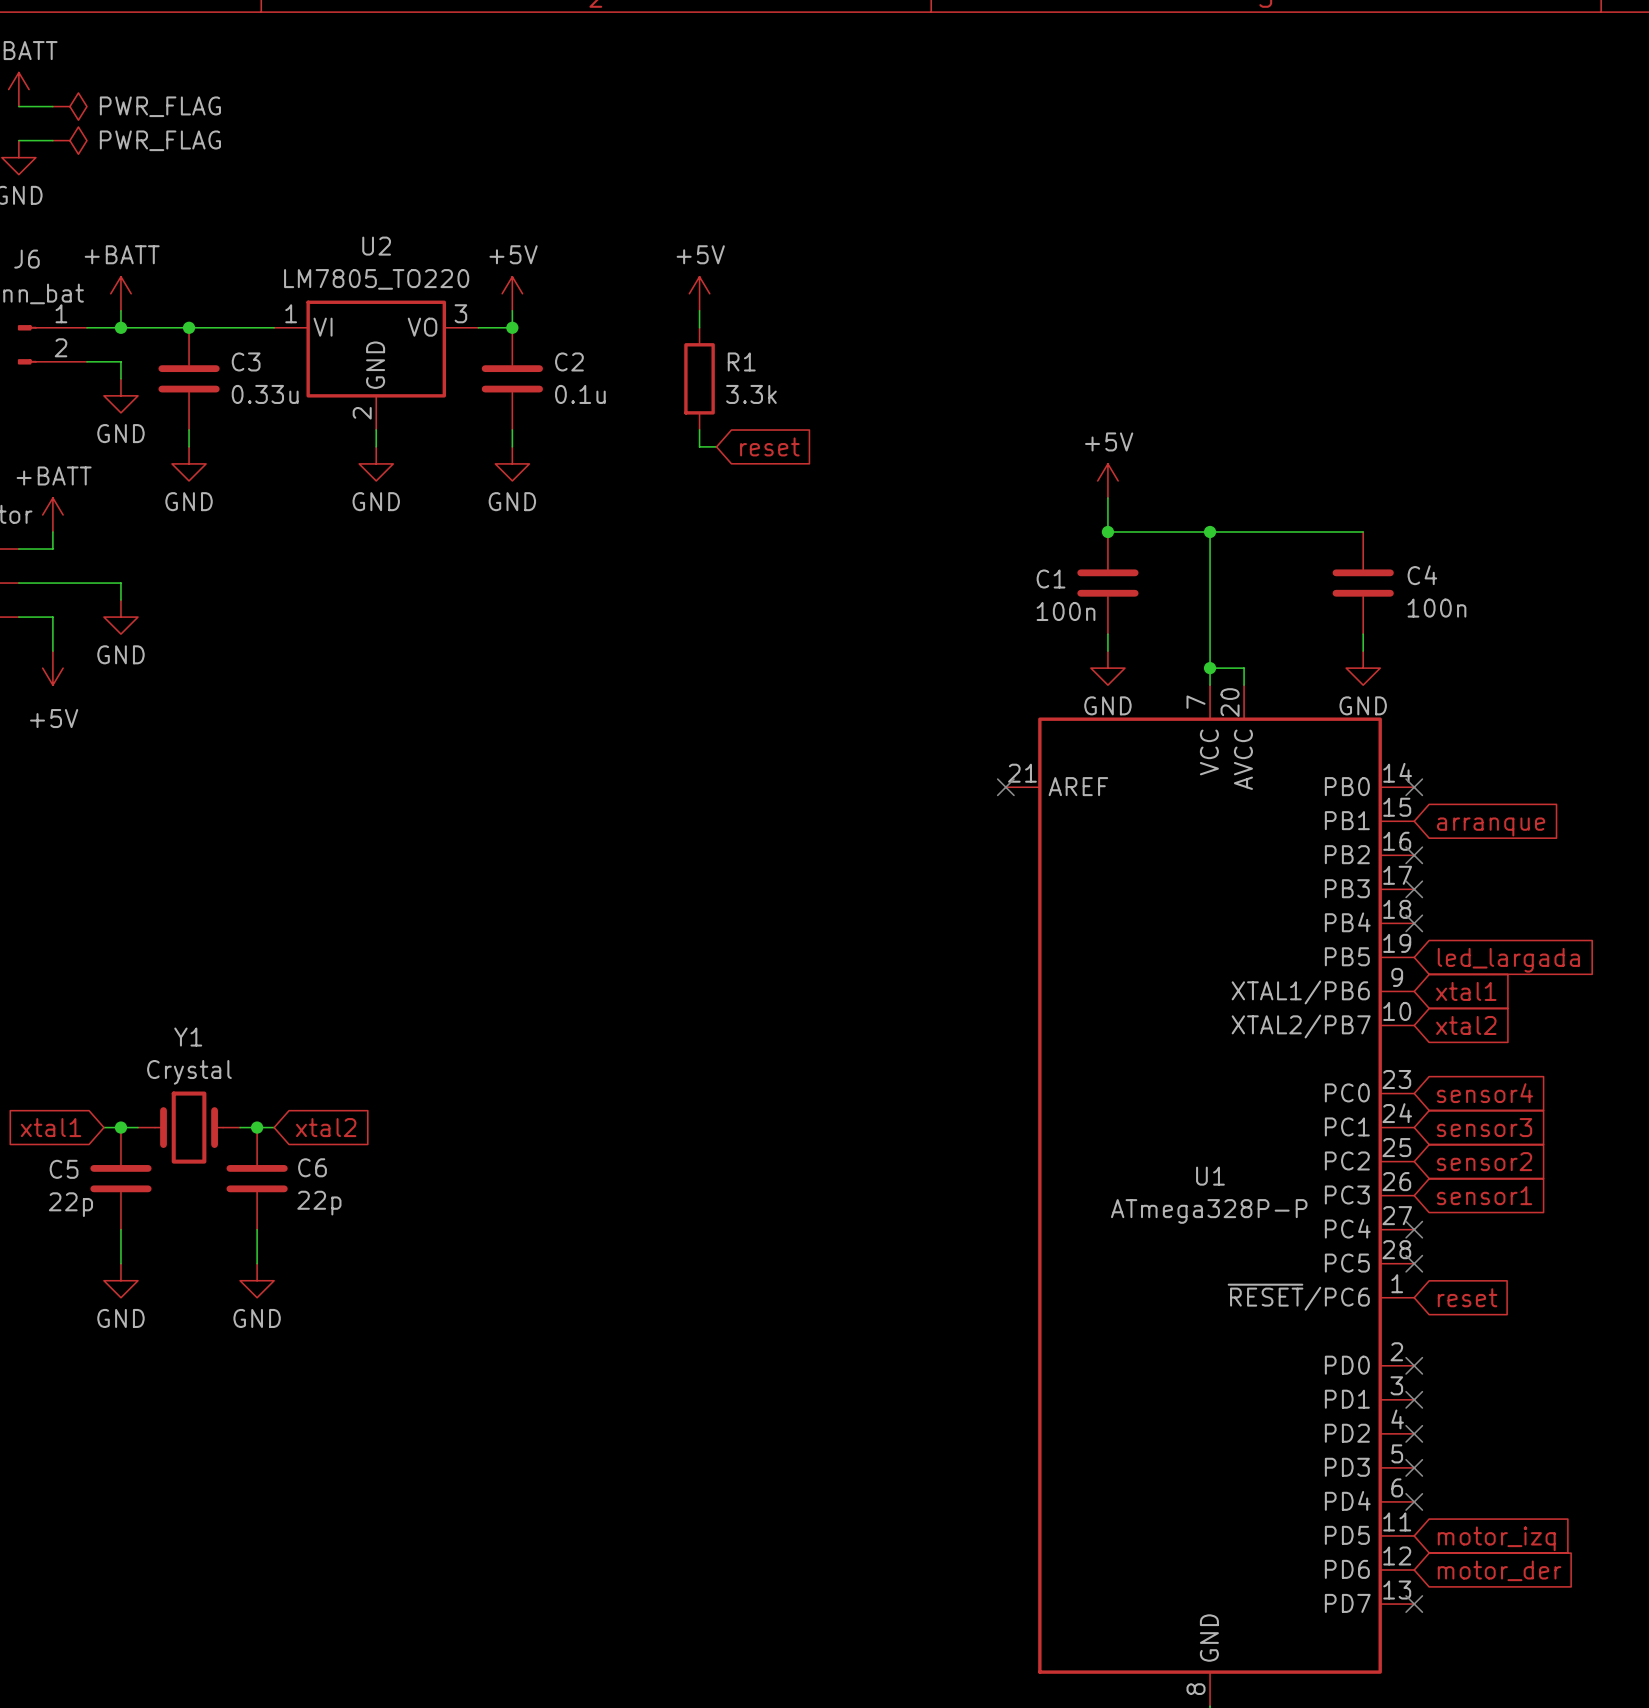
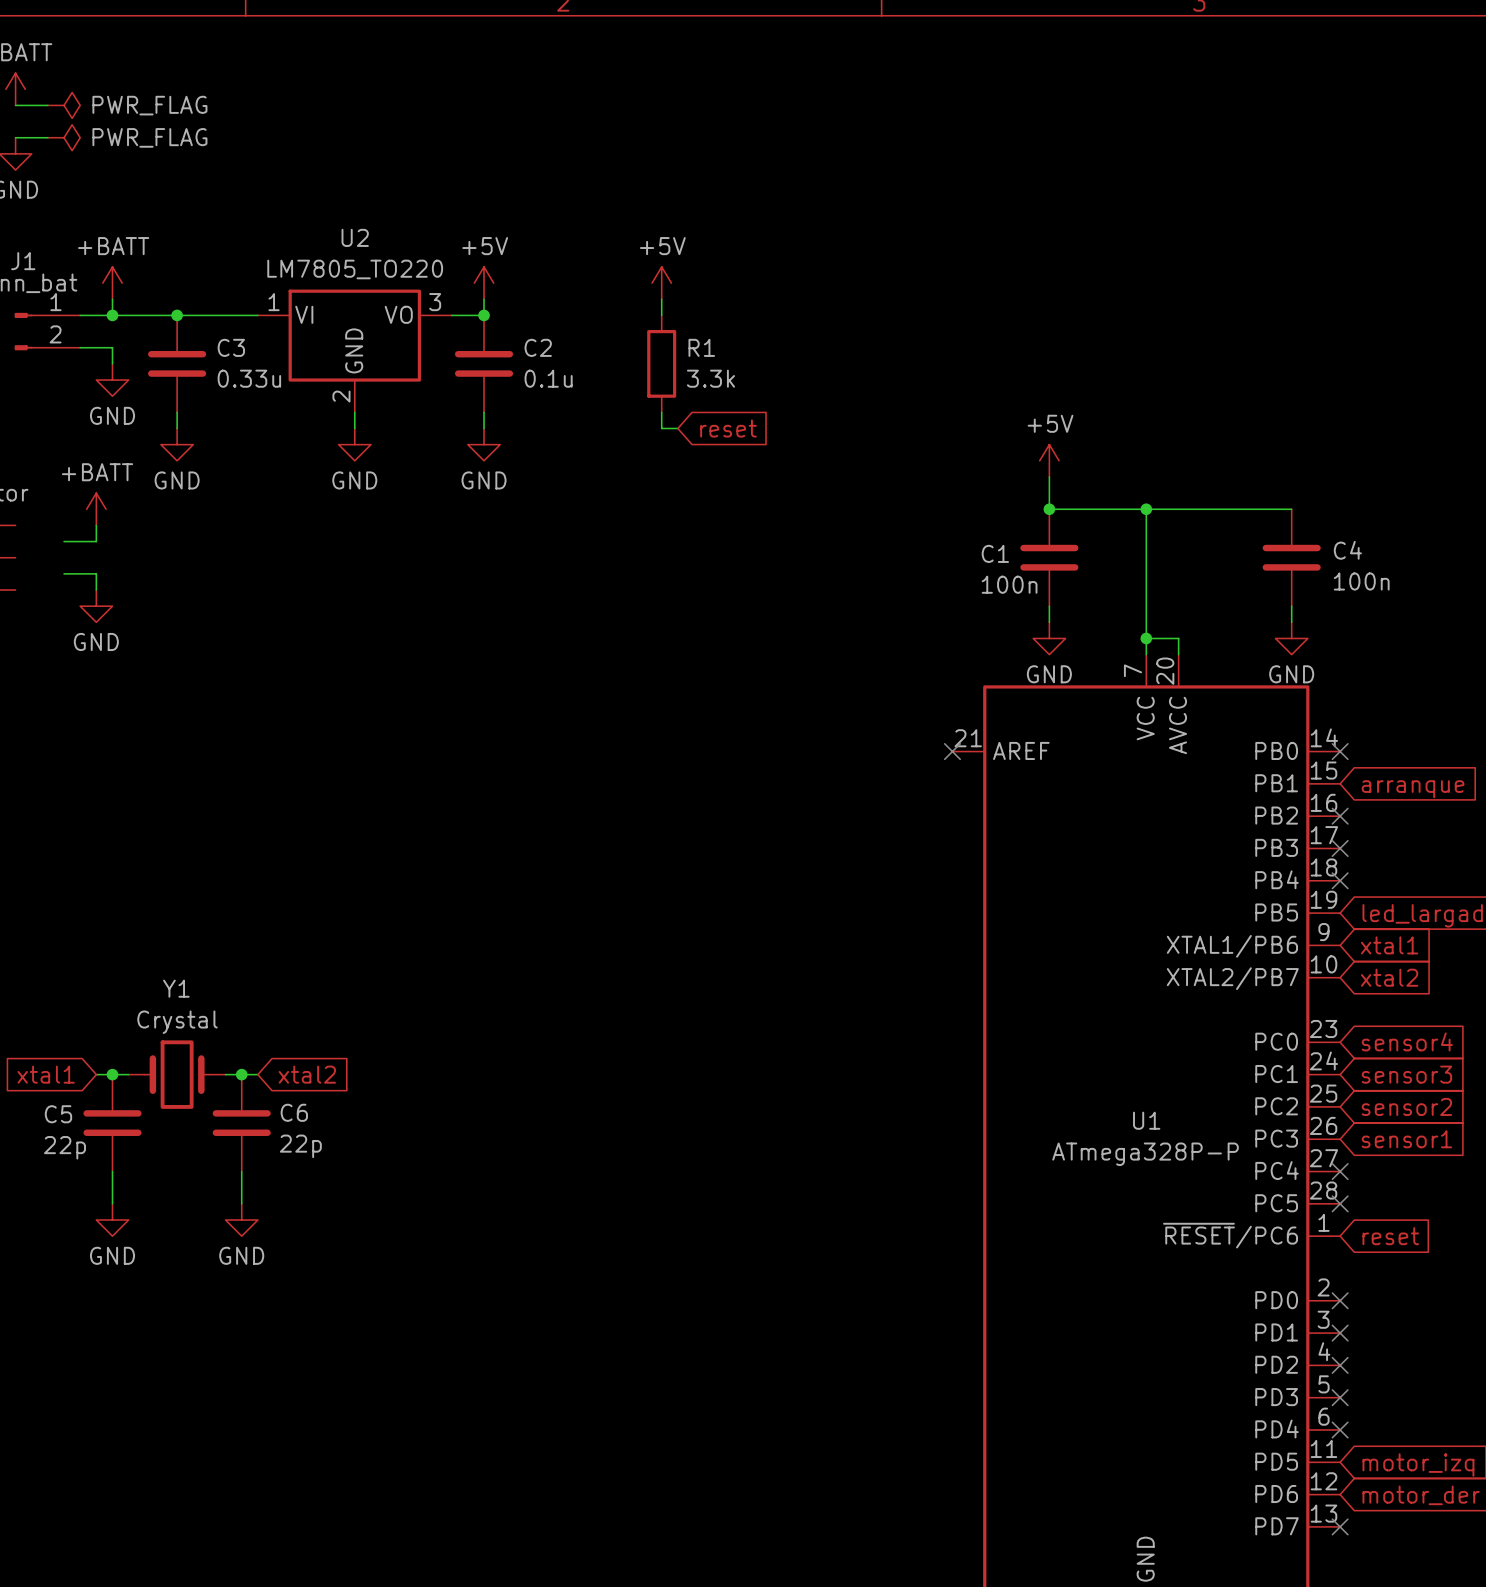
J6 name: J6 (26, 259) -> J1 (23, 261)
power symbol position: +BATT (52, 514) -> +BATT (96, 509)
wire: (52, 531) (52, 549) (18, 549) -> (96, 525) (96, 541) (64, 541)
wire: (18, 583) (120, 583) (120, 600) -> none
wire: none -> (64, 573) (96, 573) (96, 590)
wire: (18, 617) (52, 617) (52, 651) -> none
power symbol position: GND (120, 617) -> GND (96, 606)
power symbol: +5V (52, 668) -> none

